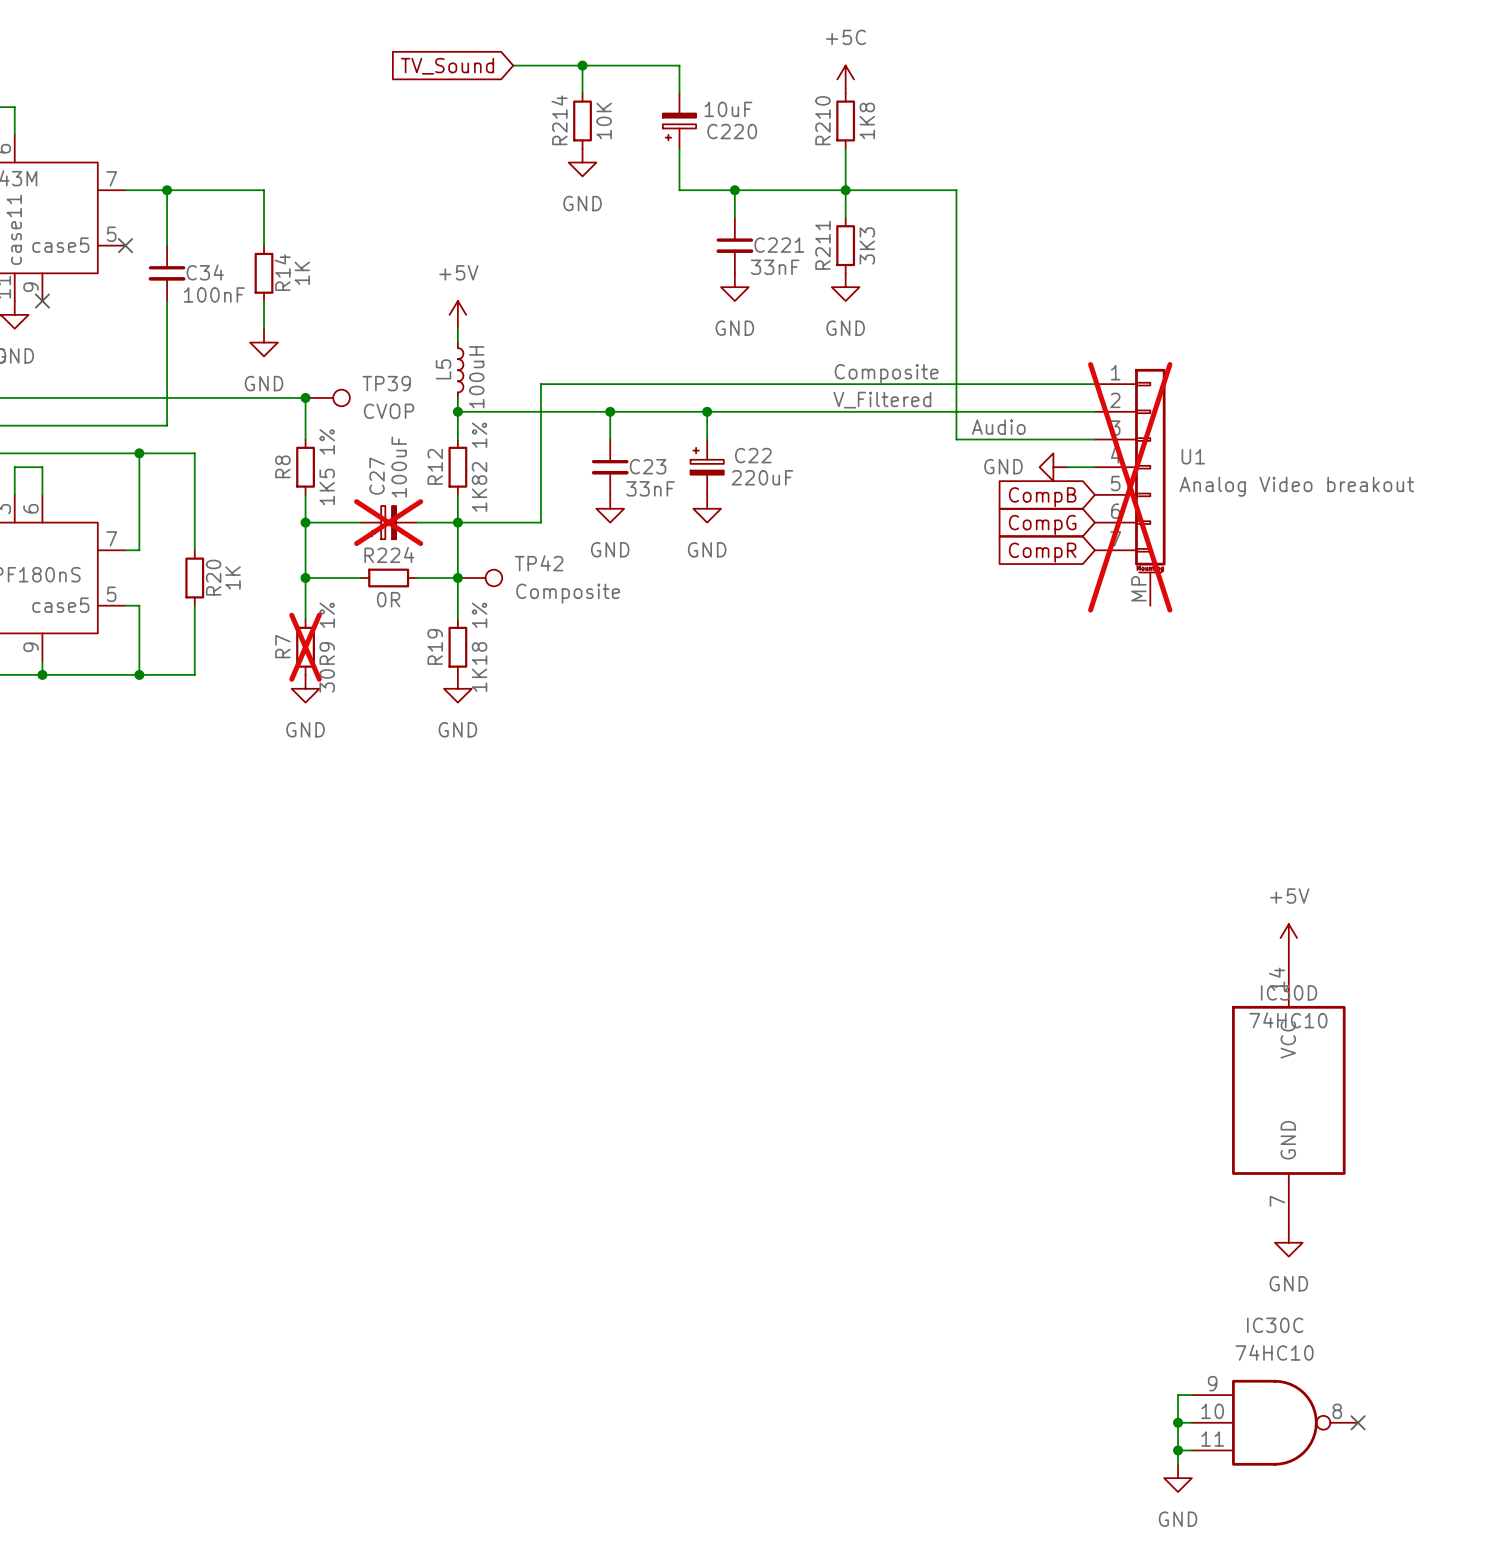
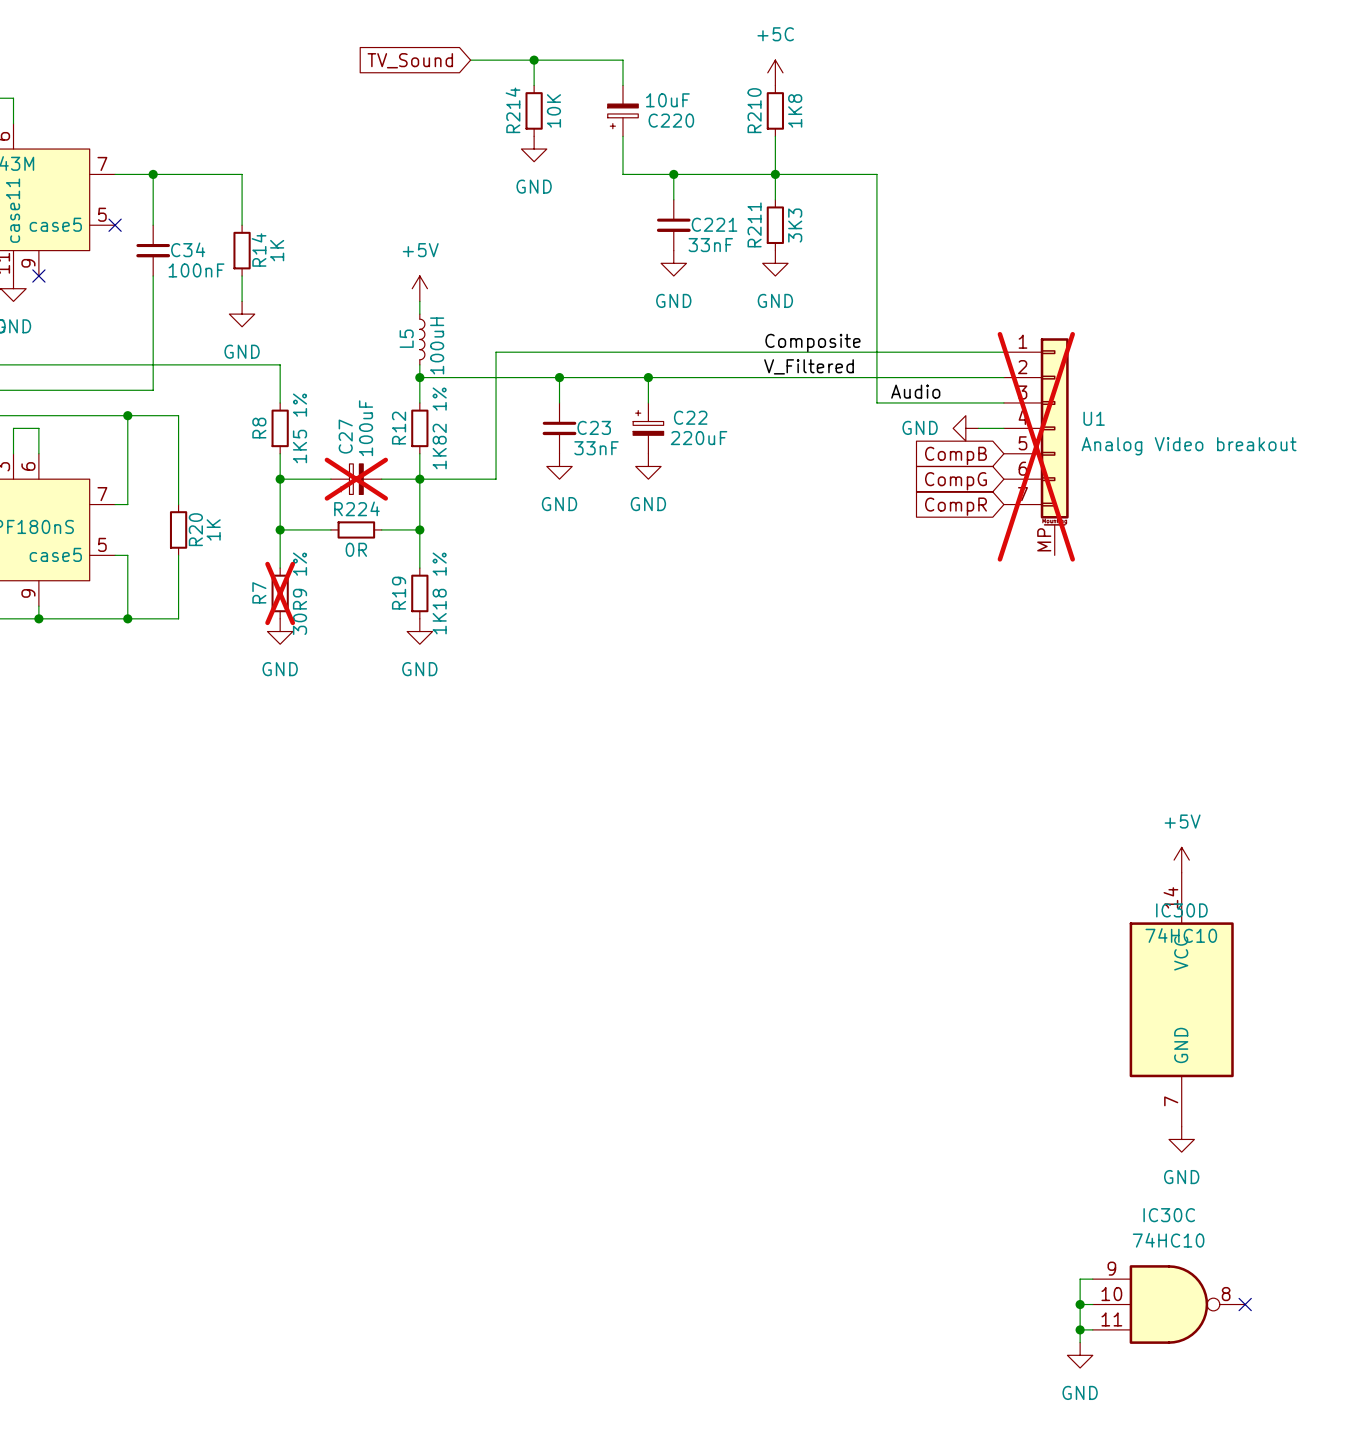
junction: (305, 397) -> none
TP39: CVOP (327, 397) -> none
TP42: Composite (480, 578) -> none

